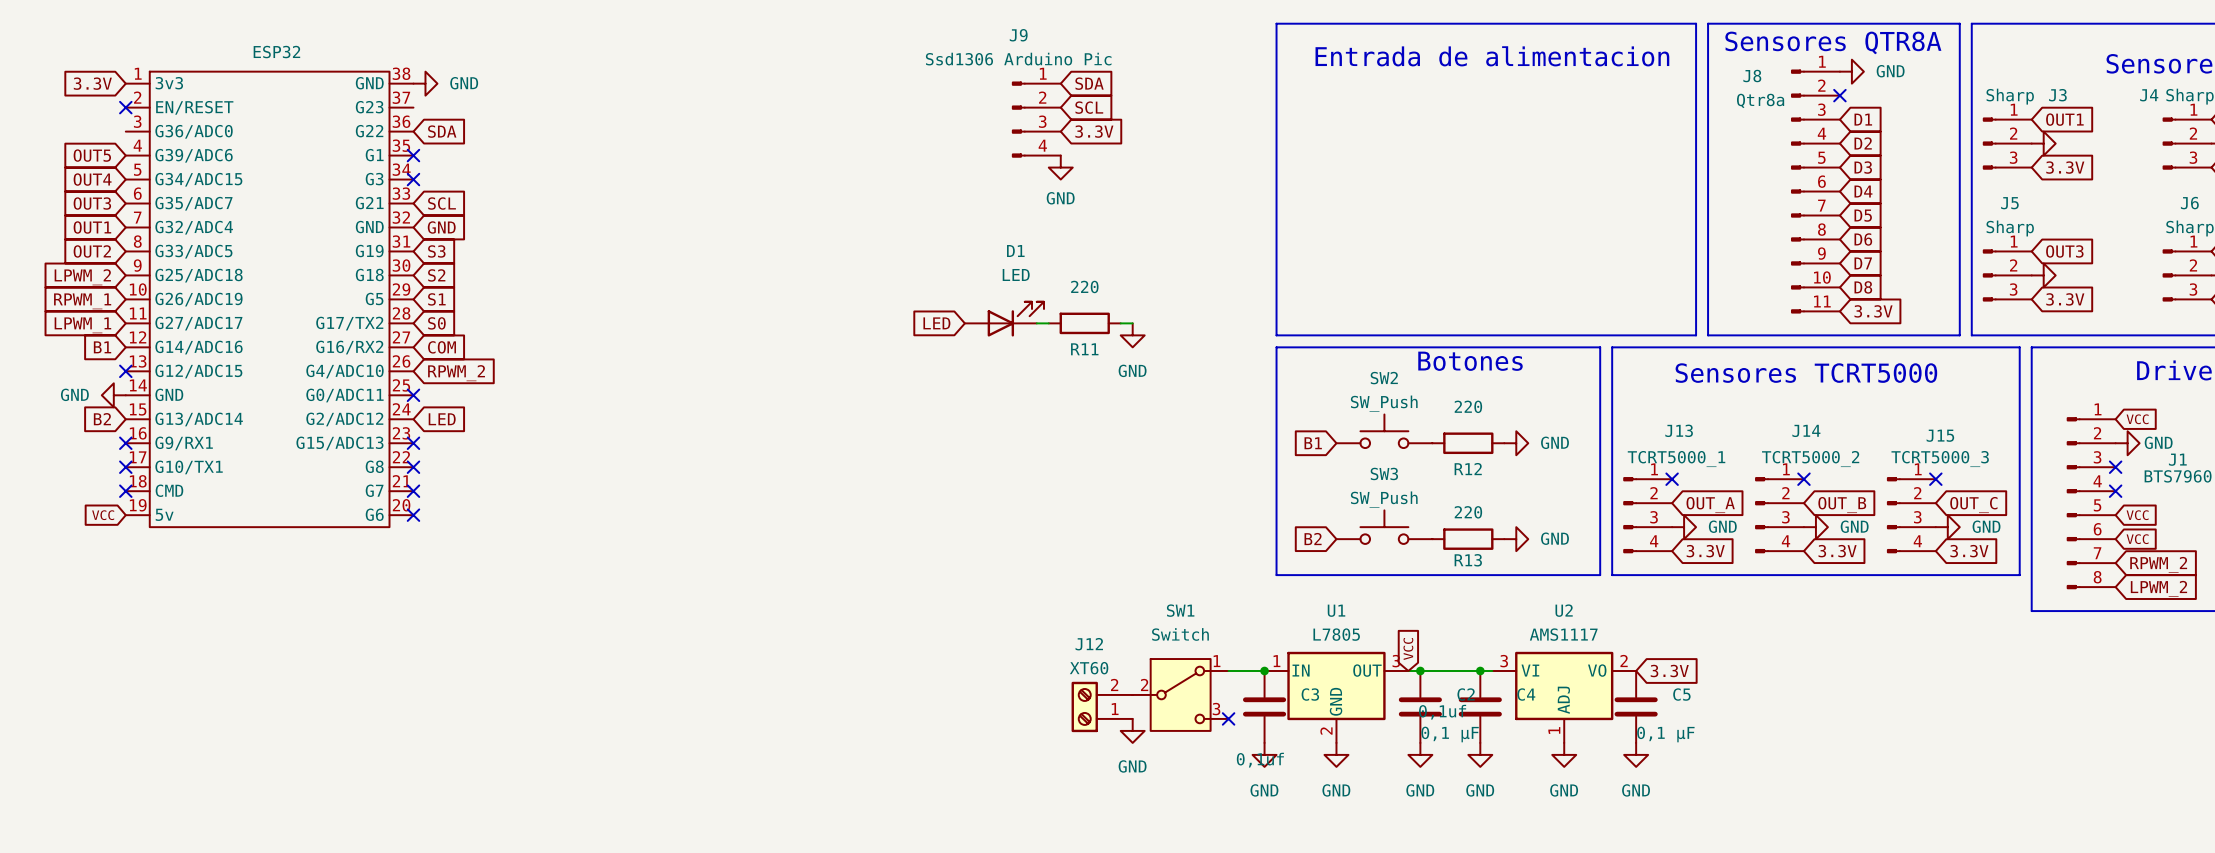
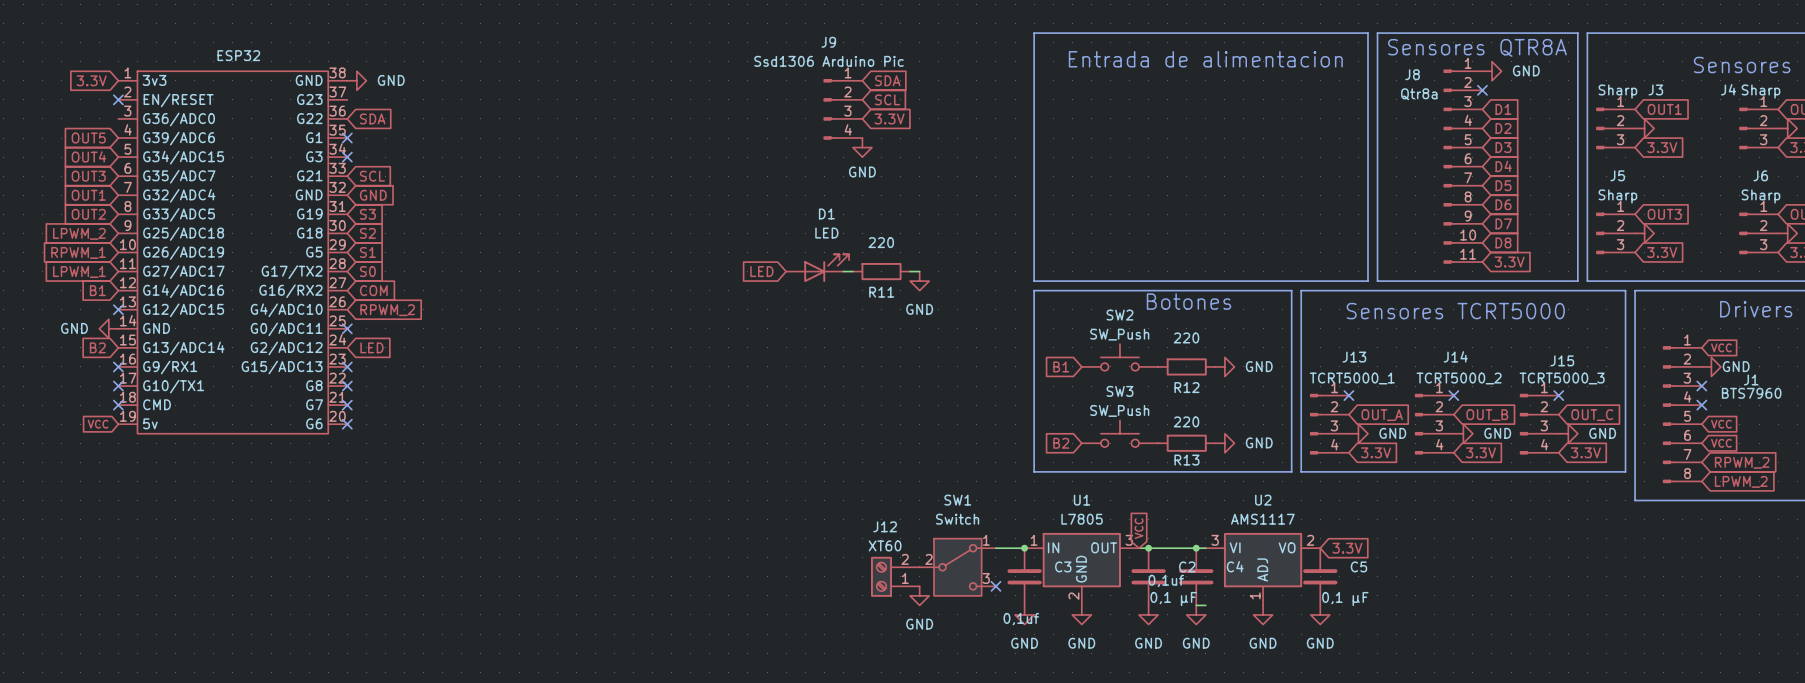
wire: none -> (1196, 605) (1205, 605)

